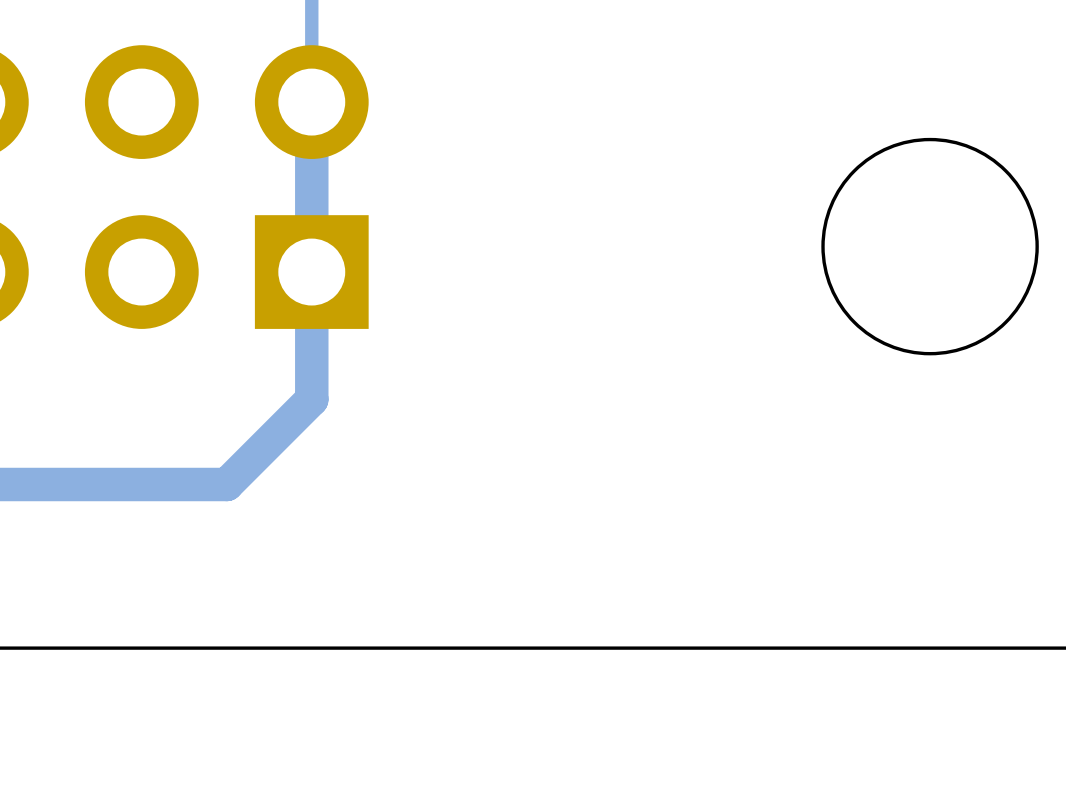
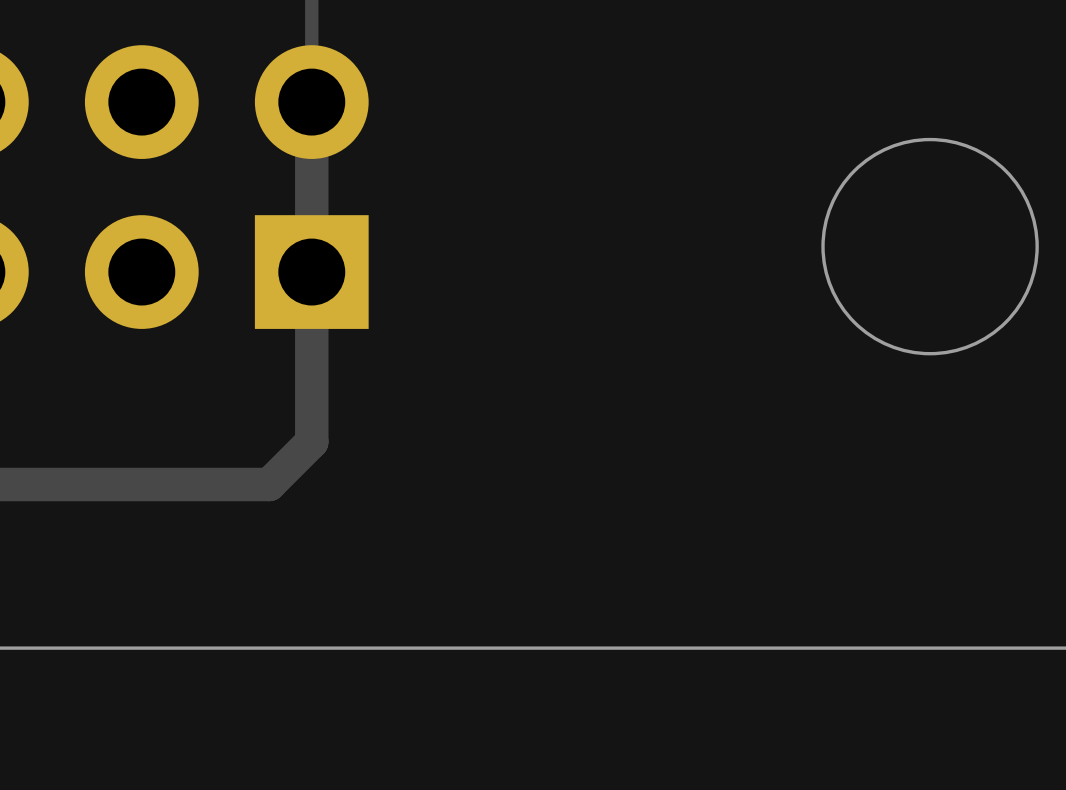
track: (311, 399) (226, 484) -> (311, 399) (311, 442) (269, 484) (226, 484)

